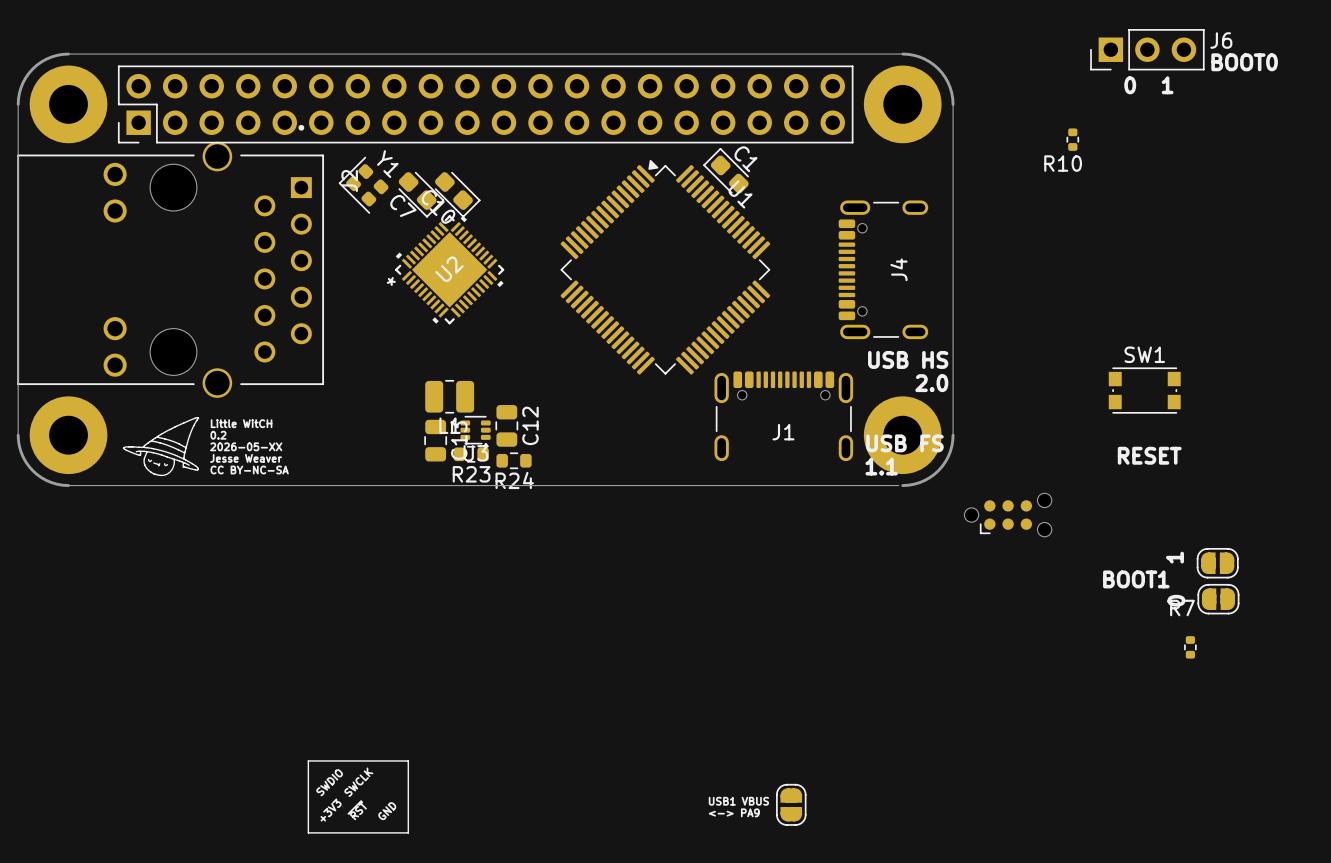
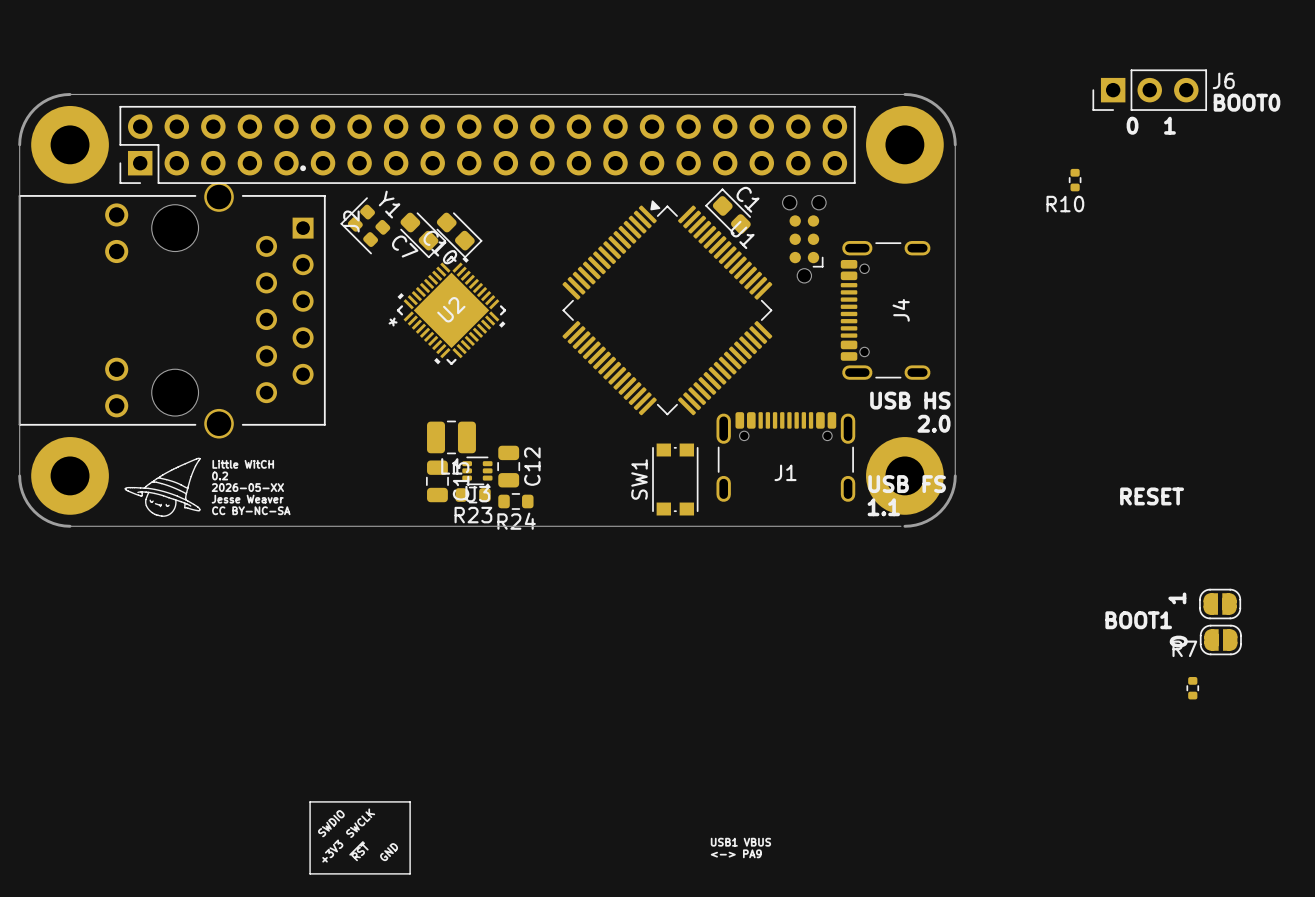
part: none -> (804, 239)
SW1 name position: SW1 (1144, 354) -> SW1 (639, 479)
SW1 rotation: 0° (1144, 390) -> 90° clockwise (675, 479)
SW1 position: (1144, 390) -> (675, 479)
part: (1008, 515) -> none
part: (791, 804) -> none

